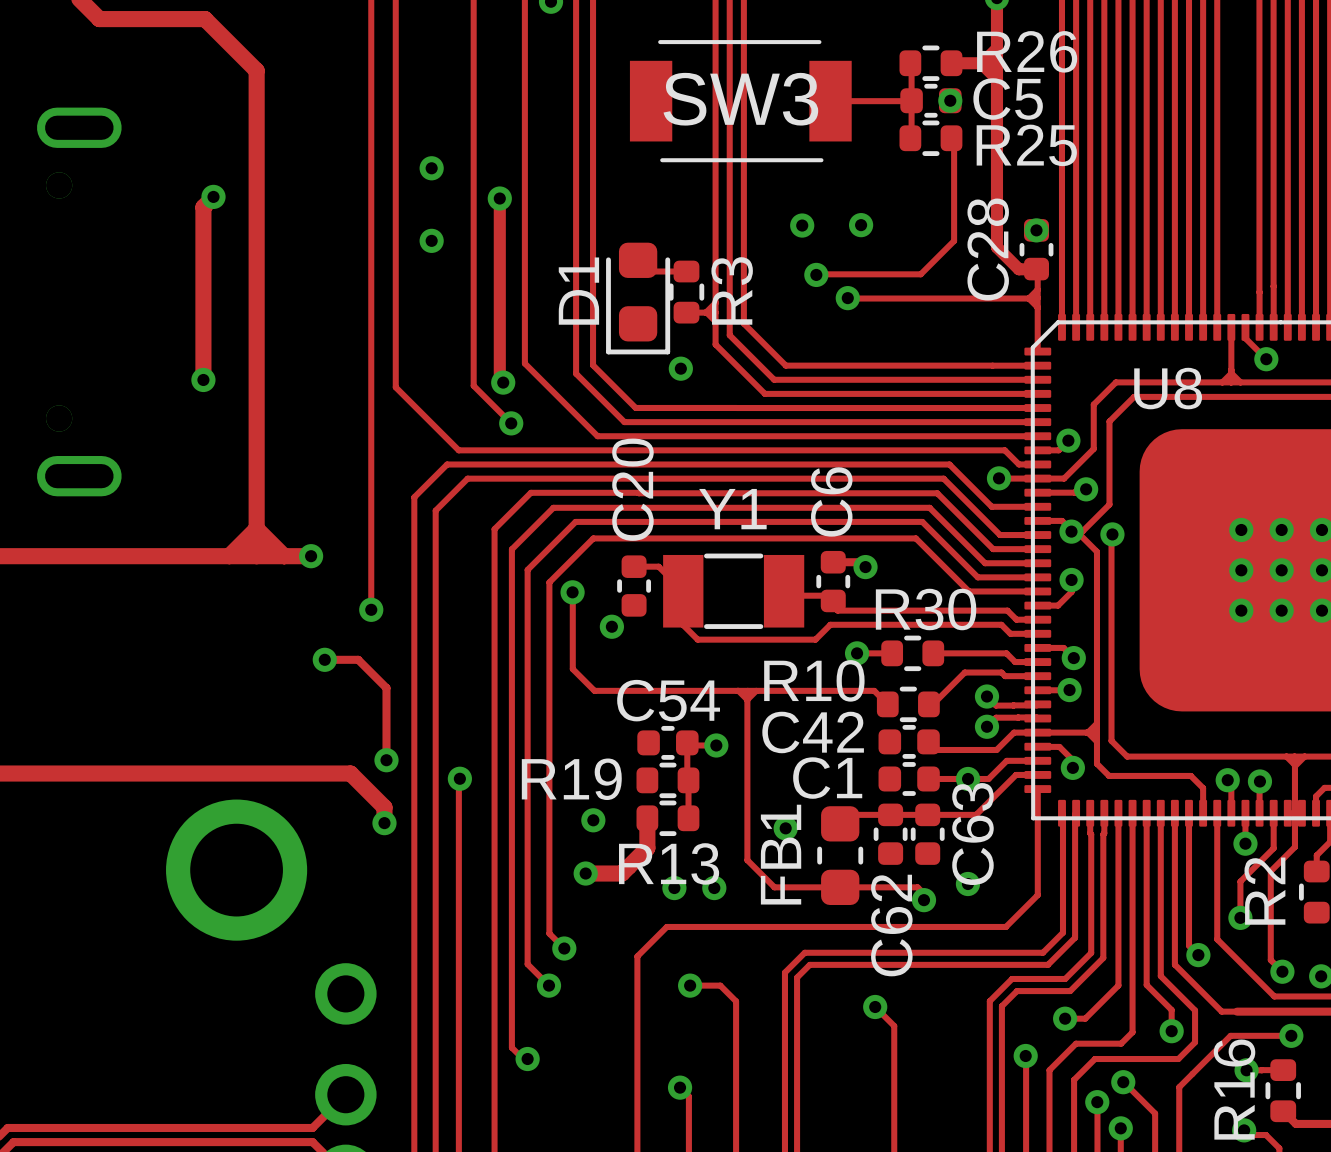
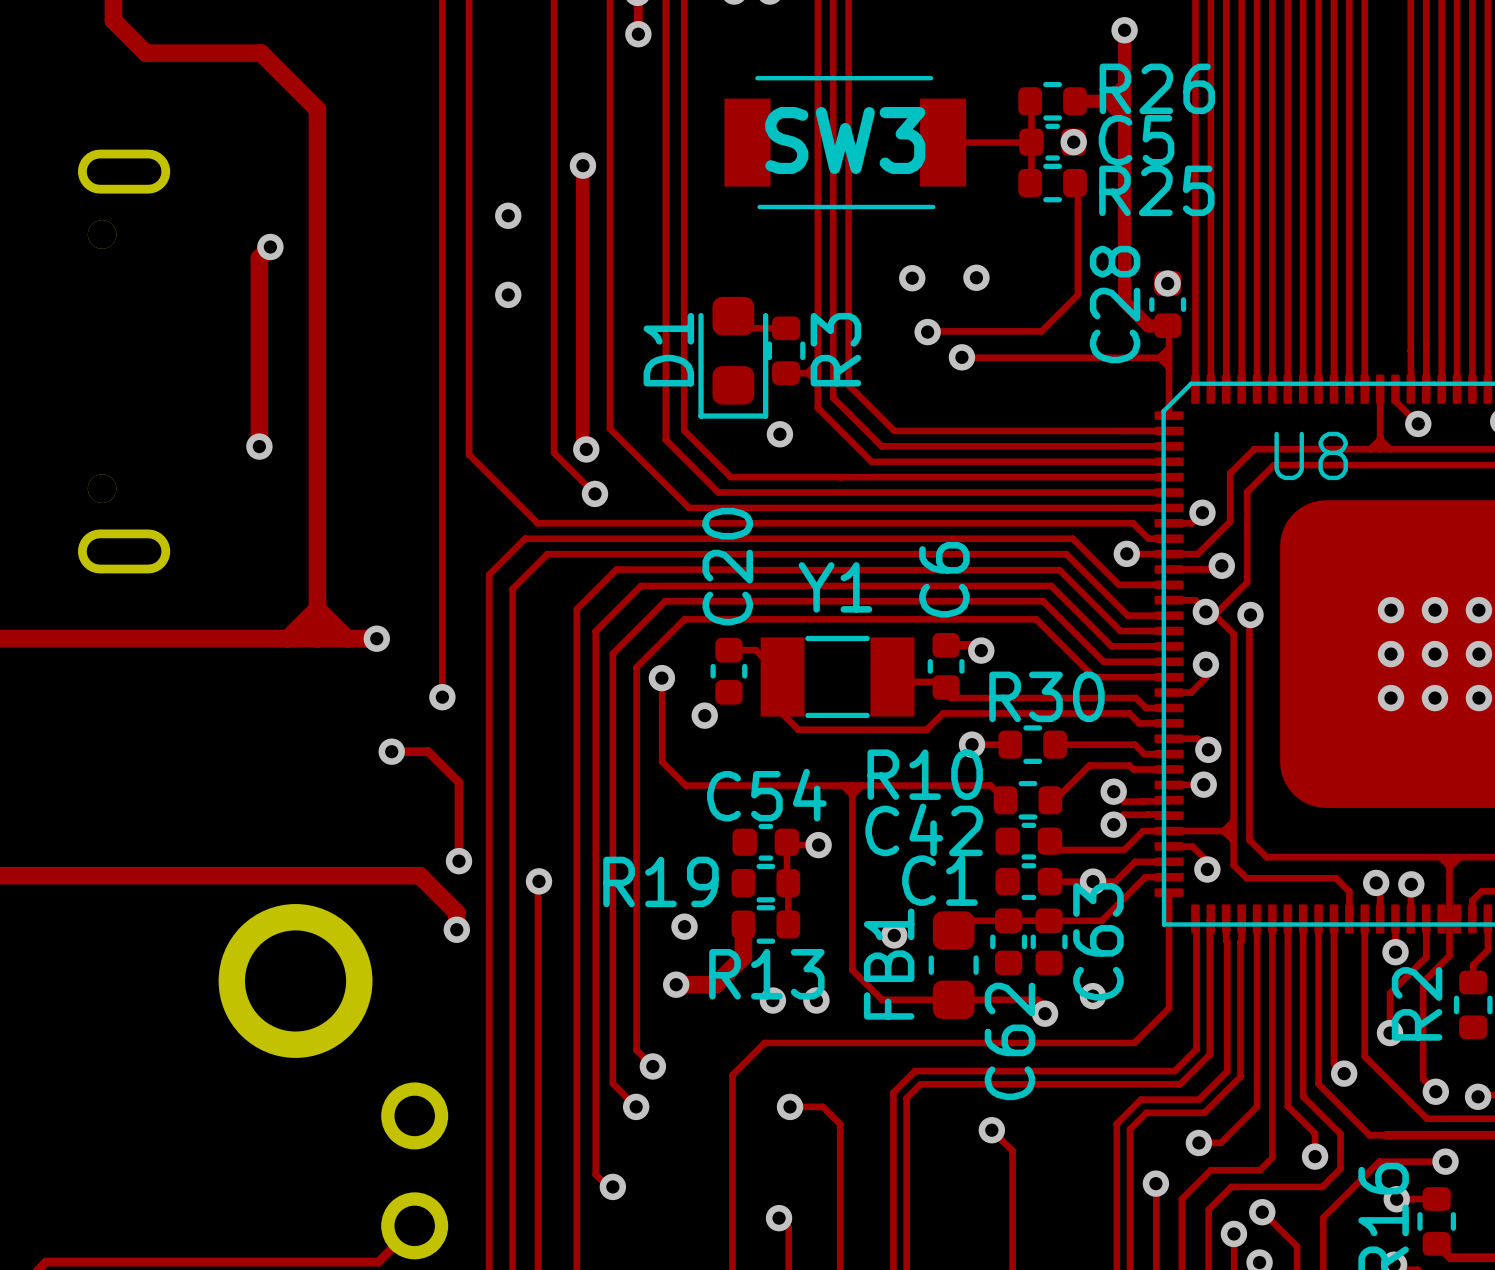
track: none -> (582, 166) (582, 248)
via position: (499, 198) -> (582, 165)

